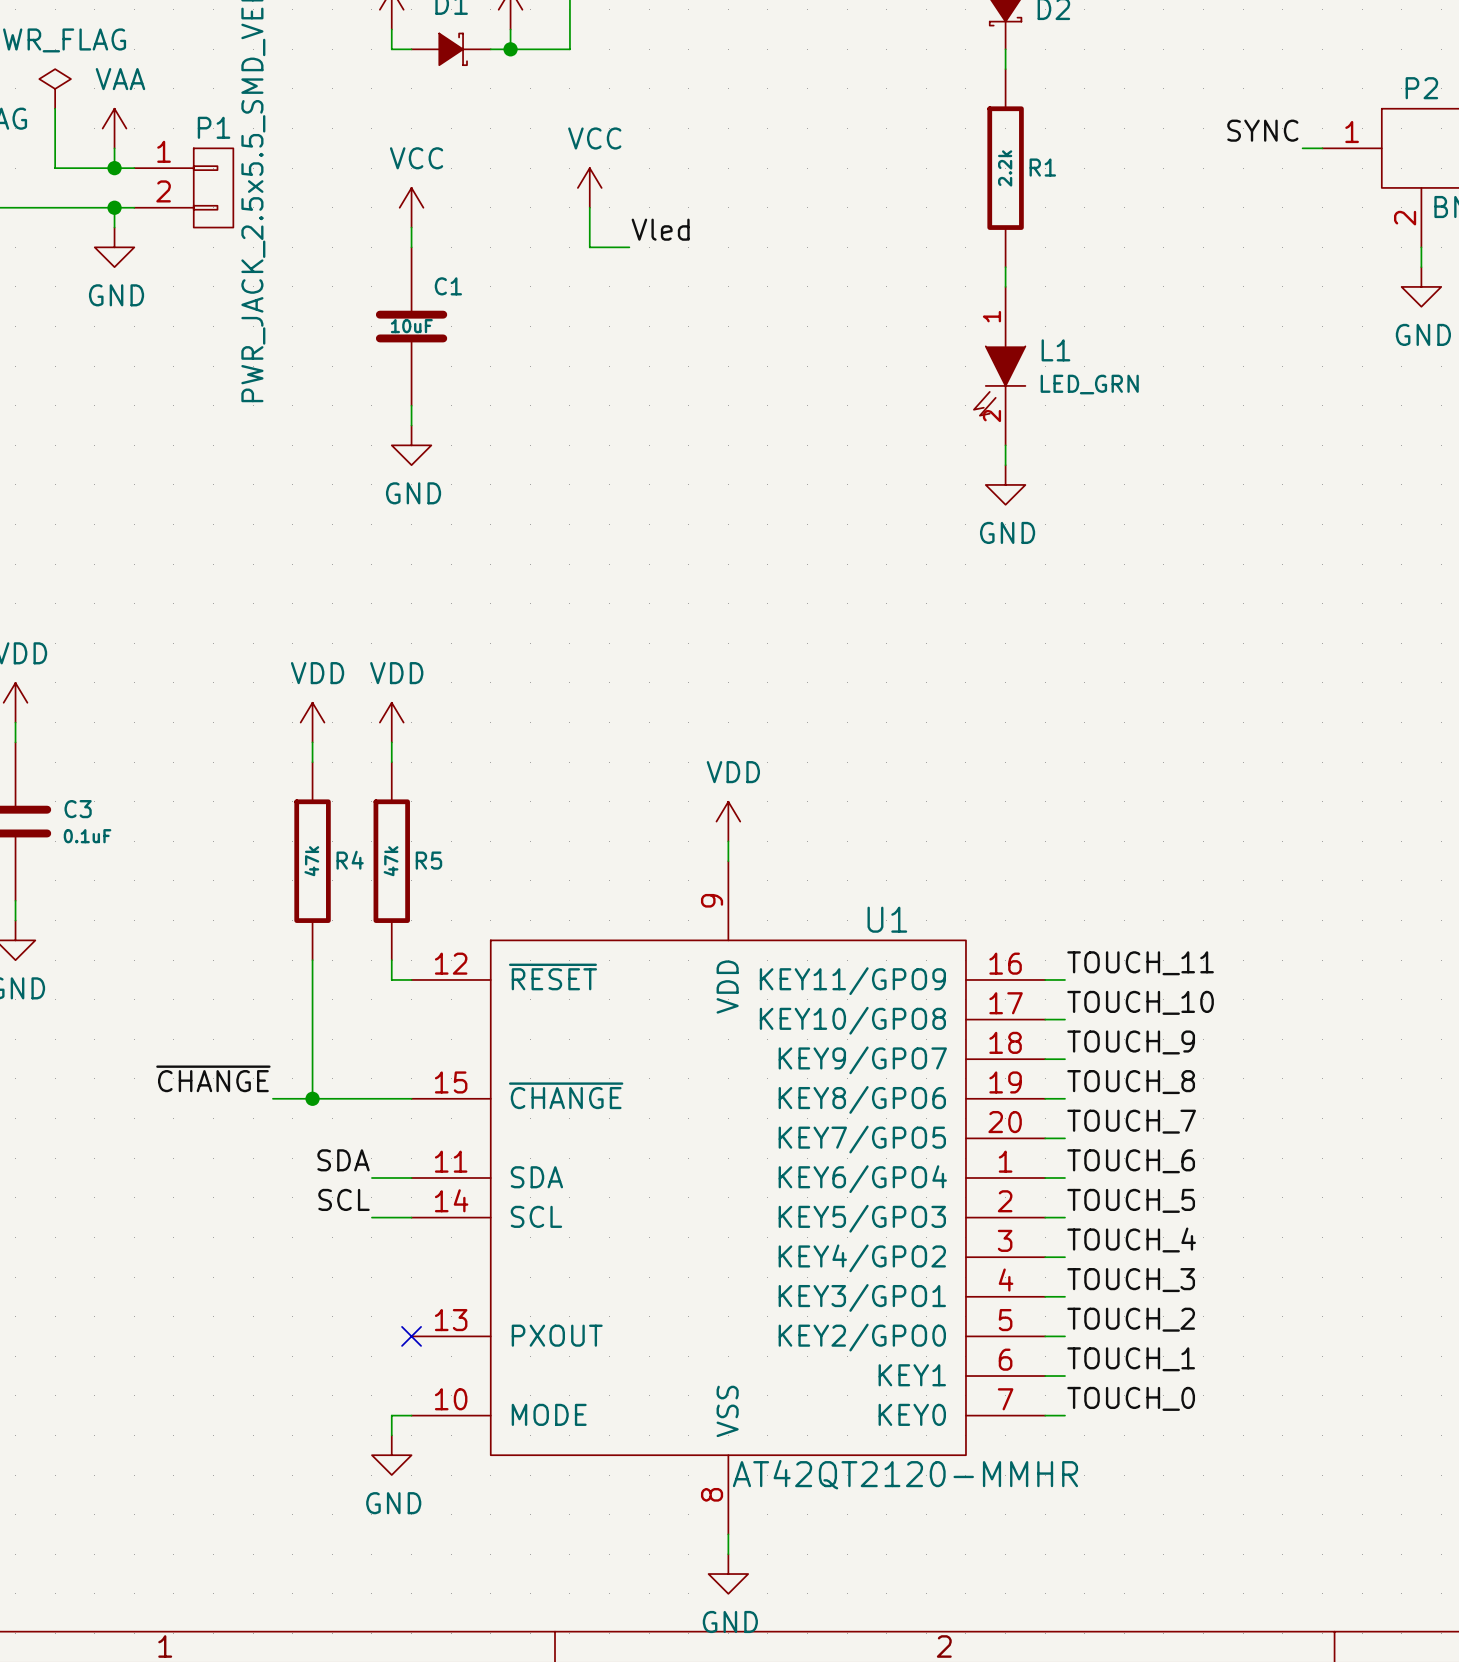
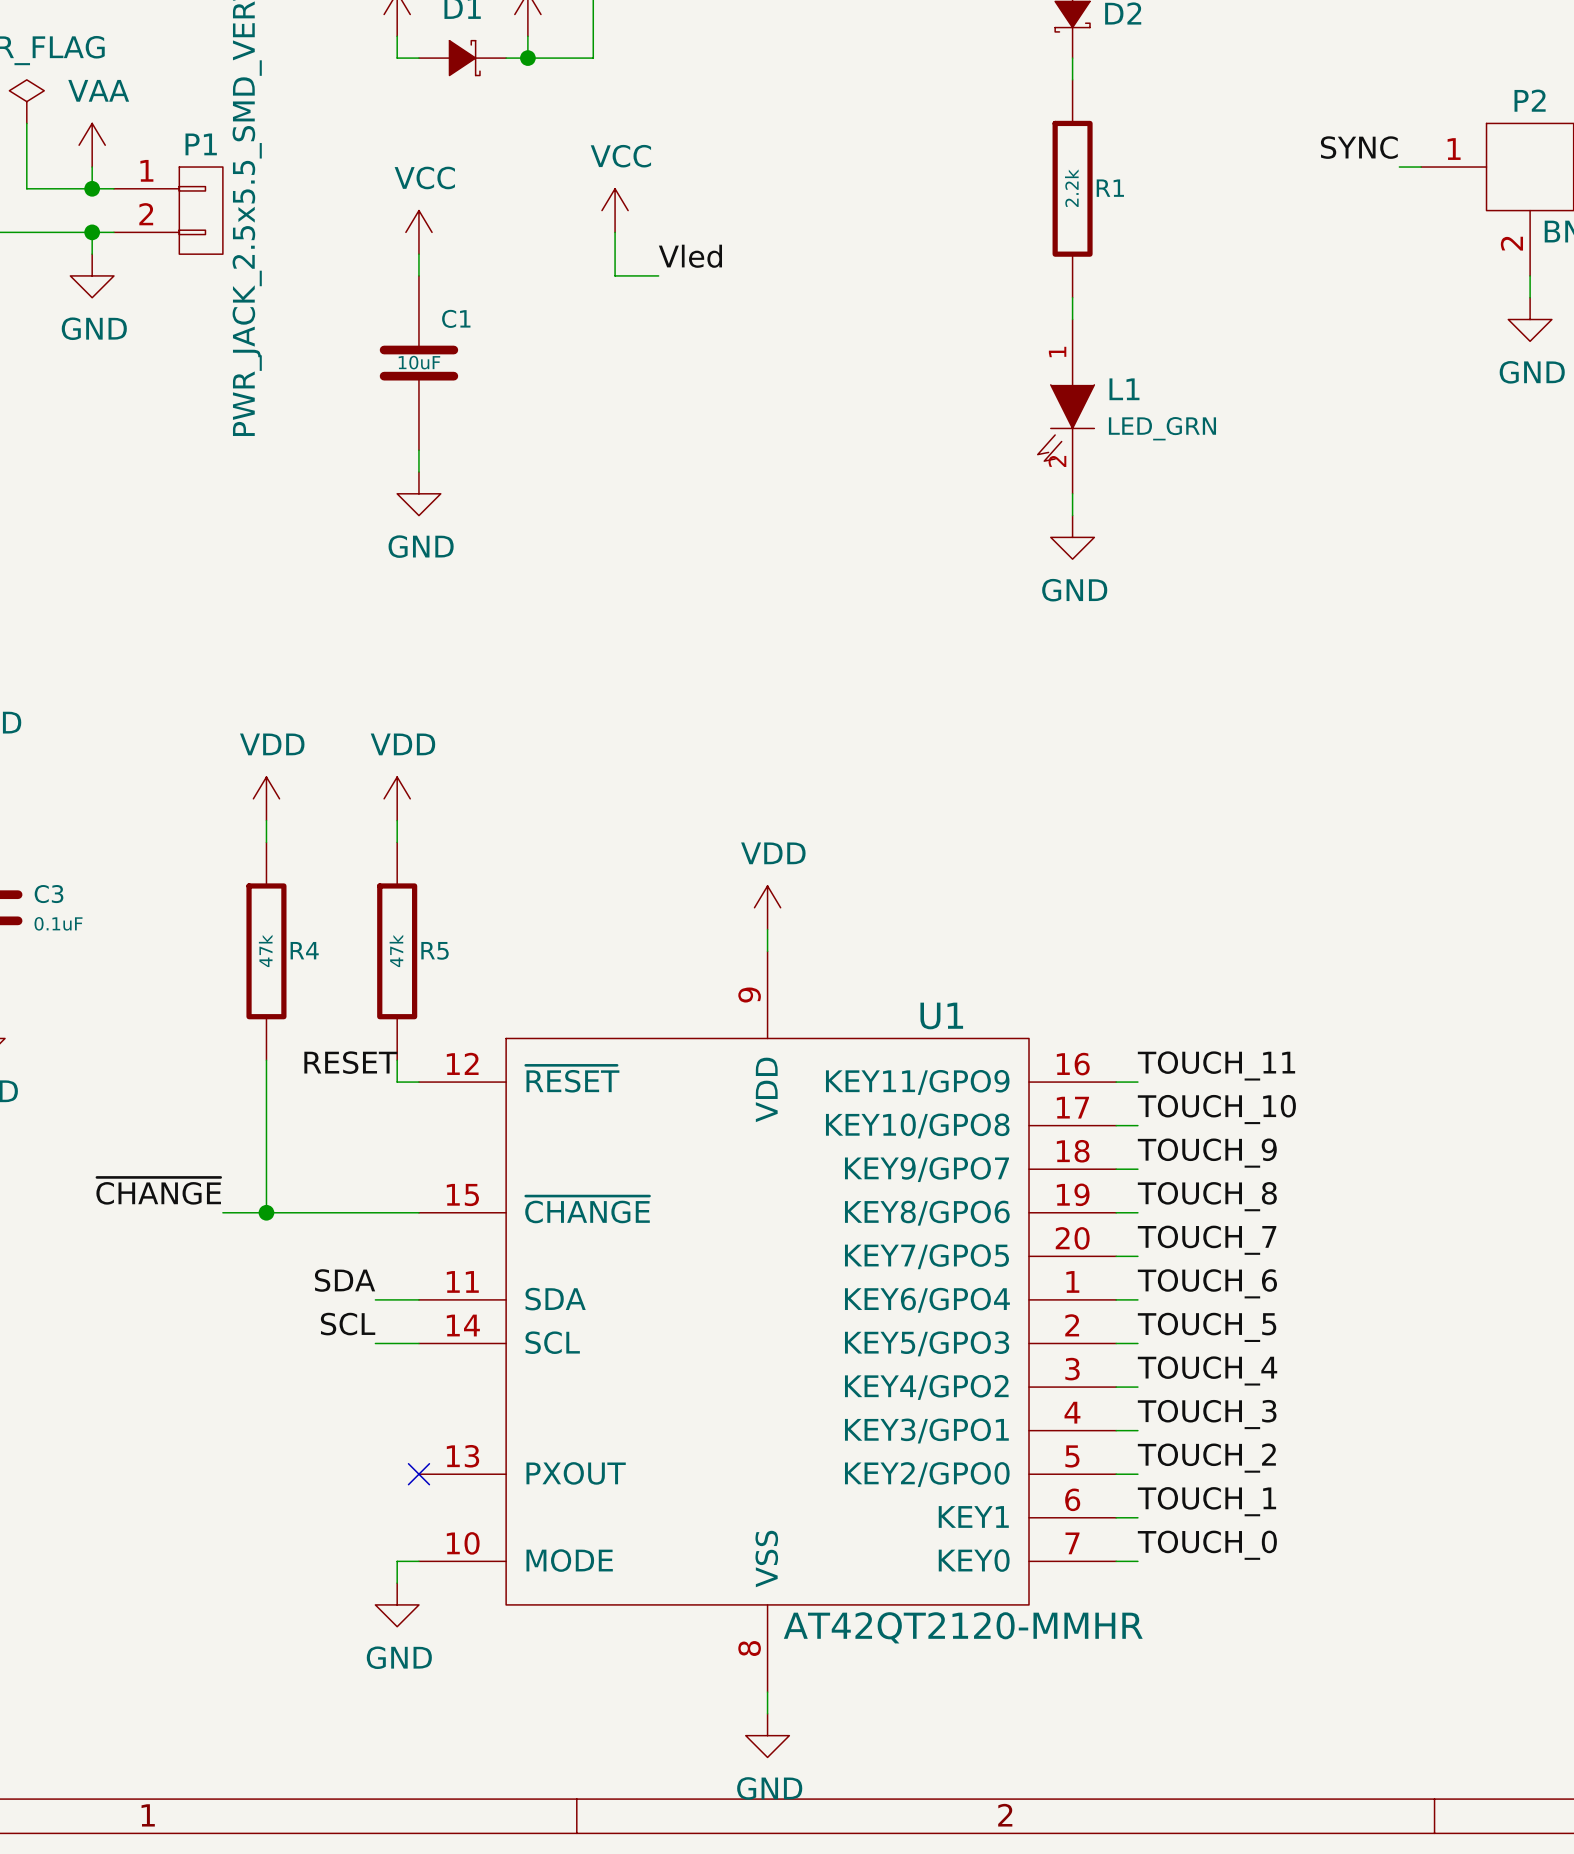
power symbol position: VDD (312, 722) -> VDD (266, 798)
wire: (312, 742) (312, 762) -> (266, 820) (266, 842)
R4 position: (312, 861) -> (266, 951)
wire: none -> (266, 1060) (266, 1212) (222, 1212)
wire: (312, 960) (312, 1098) -> none
label: none -> RESET (350, 1062)
label position: ~{CHANGE} (213, 1078) -> ~{CHANGE} (158, 1191)
junction position: (312, 1098) -> (266, 1212)

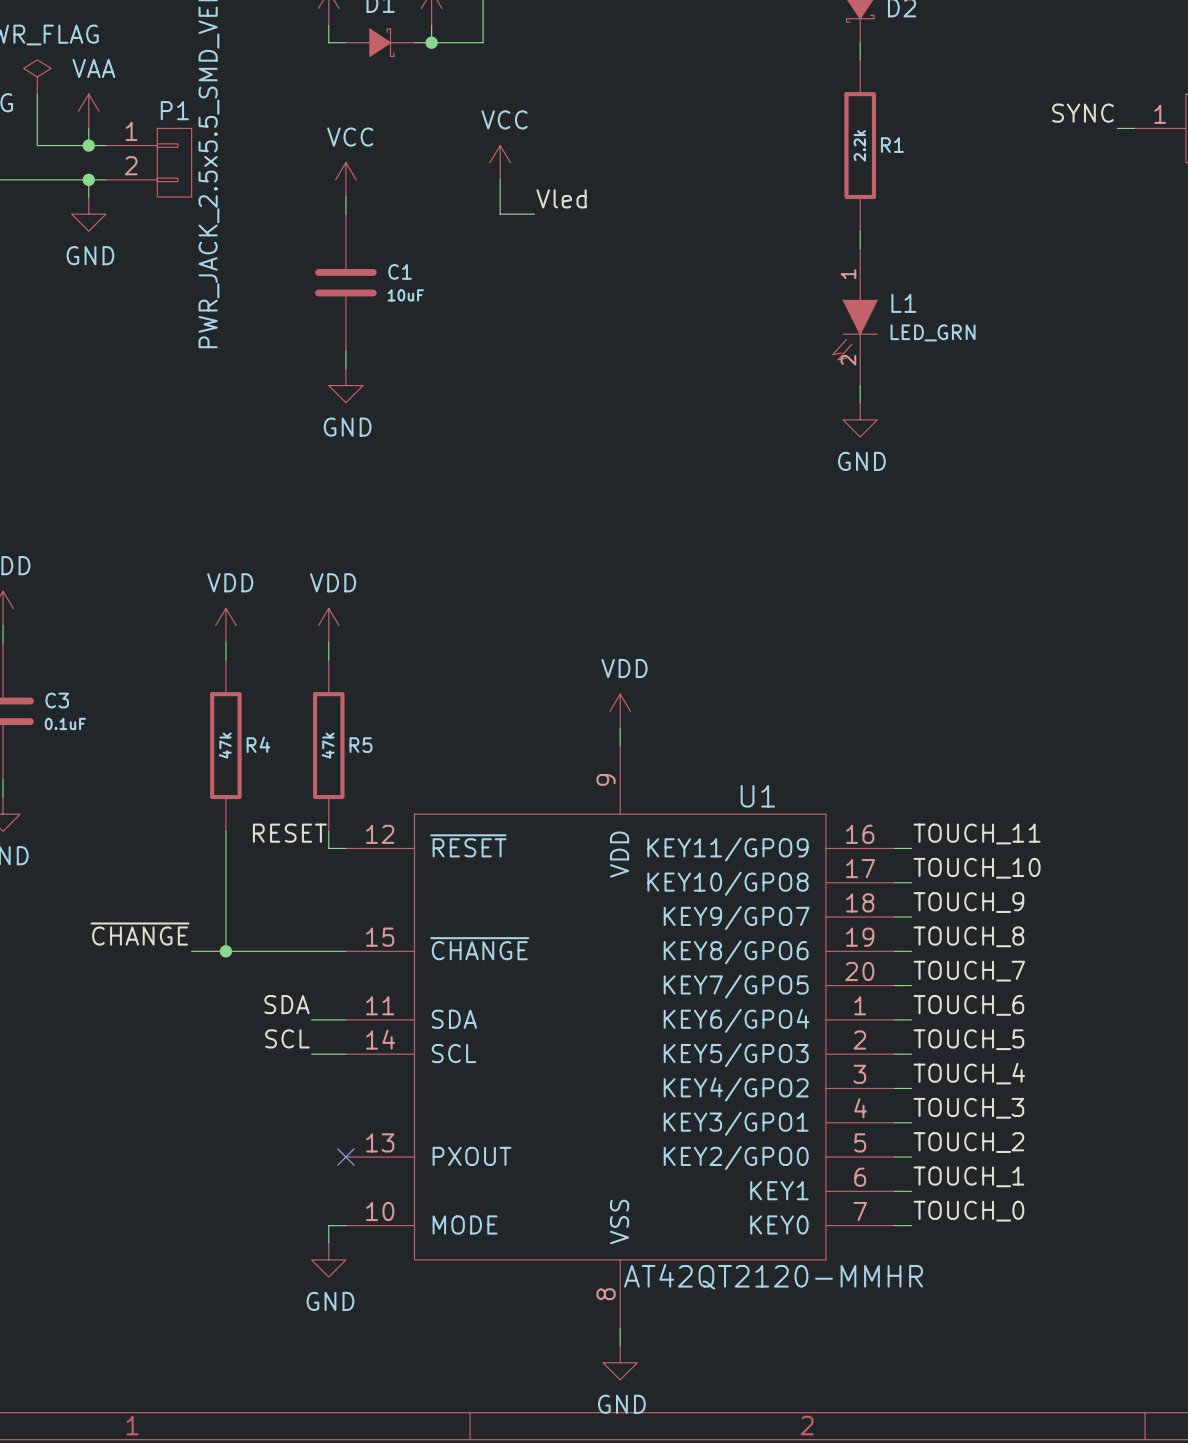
C1 name position: C1 (456, 318) -> C1 (400, 271)
C1 value position: 10uF (419, 362) -> 10uF (405, 295)

